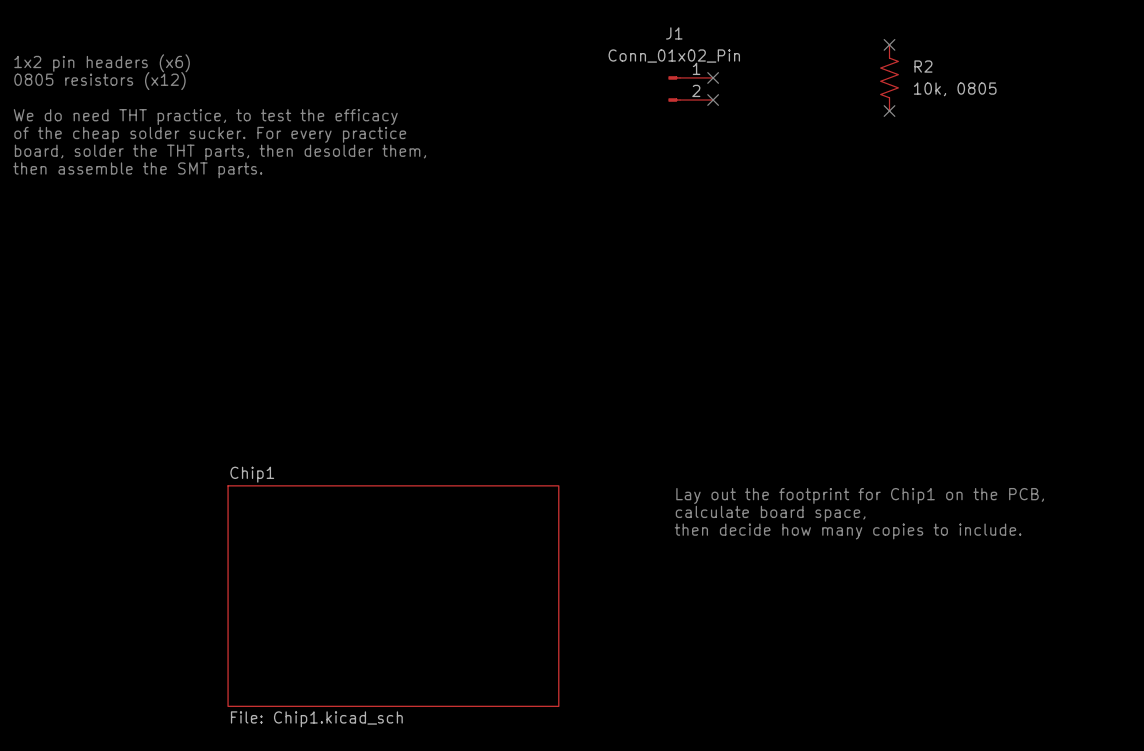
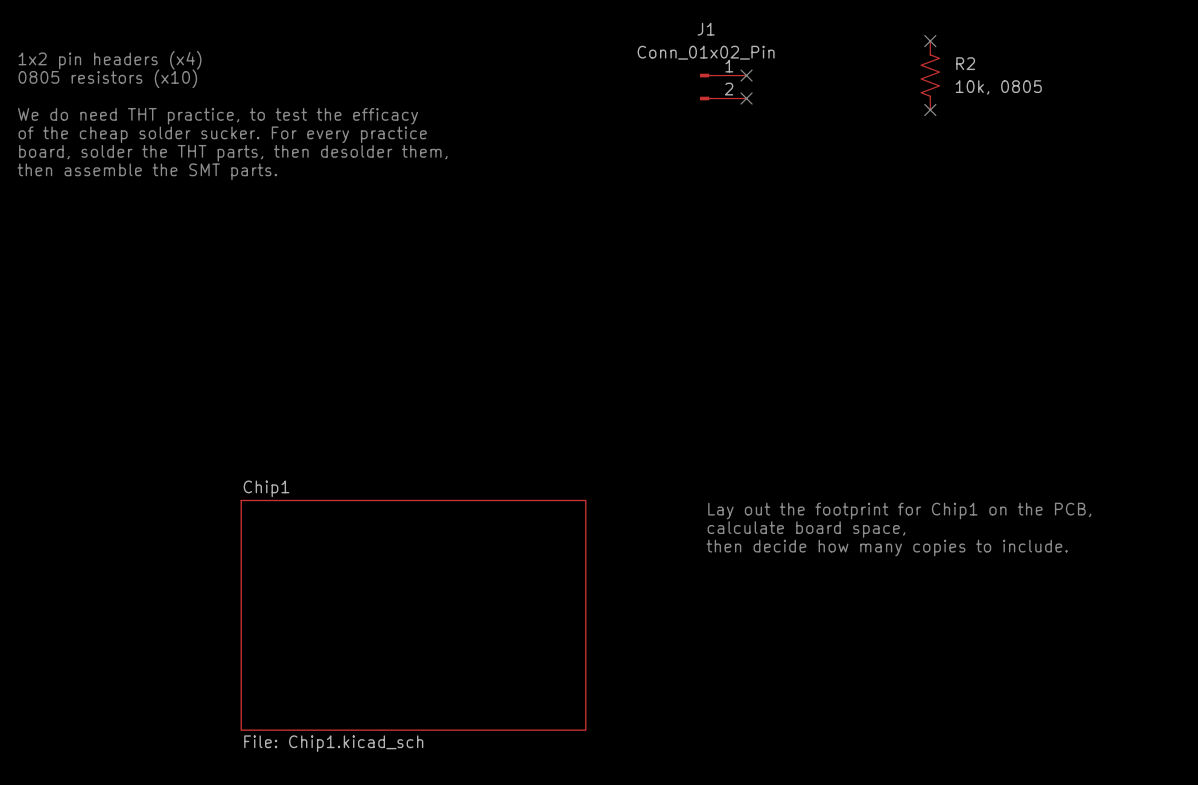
text: 1x2 pin headers (x6) (102, 63) -> 1x2 pin headers (x4) (110, 60)
text: 0805 resistors (x12) (99, 81) -> 0805 resistors (x10) (107, 78)

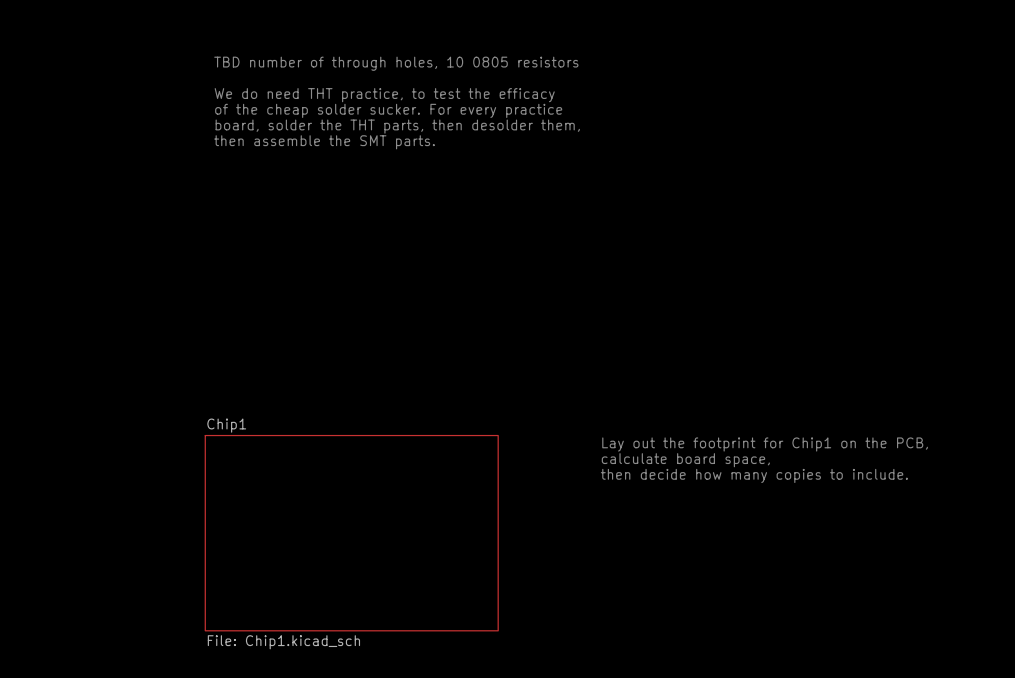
no-connect mark: (930, 41) -> none
text: 1x2 pin headers (x4) (110, 60) -> none
text: none -> TBD number of through holes, 10 0805 resistors (396, 63)
no-connect mark: (746, 75) -> none
R2: 10k, 0805 (930, 75) -> none
text: 0805 resistors (x10) (107, 78) -> none
J1: Conn_01x02_Pin (723, 87) -> none
no-connect mark: (746, 98) -> none
text: none -> We do need THT practice, to test the efficacy (384, 95)
no-connect mark: (930, 110) -> none
text: We do need THT practice, to test the efficacy (218, 116) -> none
text: none -> of the cheap solder sucker. For every practice (388, 110)
text: of the cheap solder sucker. For every practice (222, 134) -> none
text: none -> board, solder the THT parts, then desolder them, (397, 126)
text: board, solder the THT parts, then desolder them, (233, 153) -> none
text: none -> then assemble the SMT parts. (324, 142)
text: then assemble the SMT parts. (147, 171) -> none

